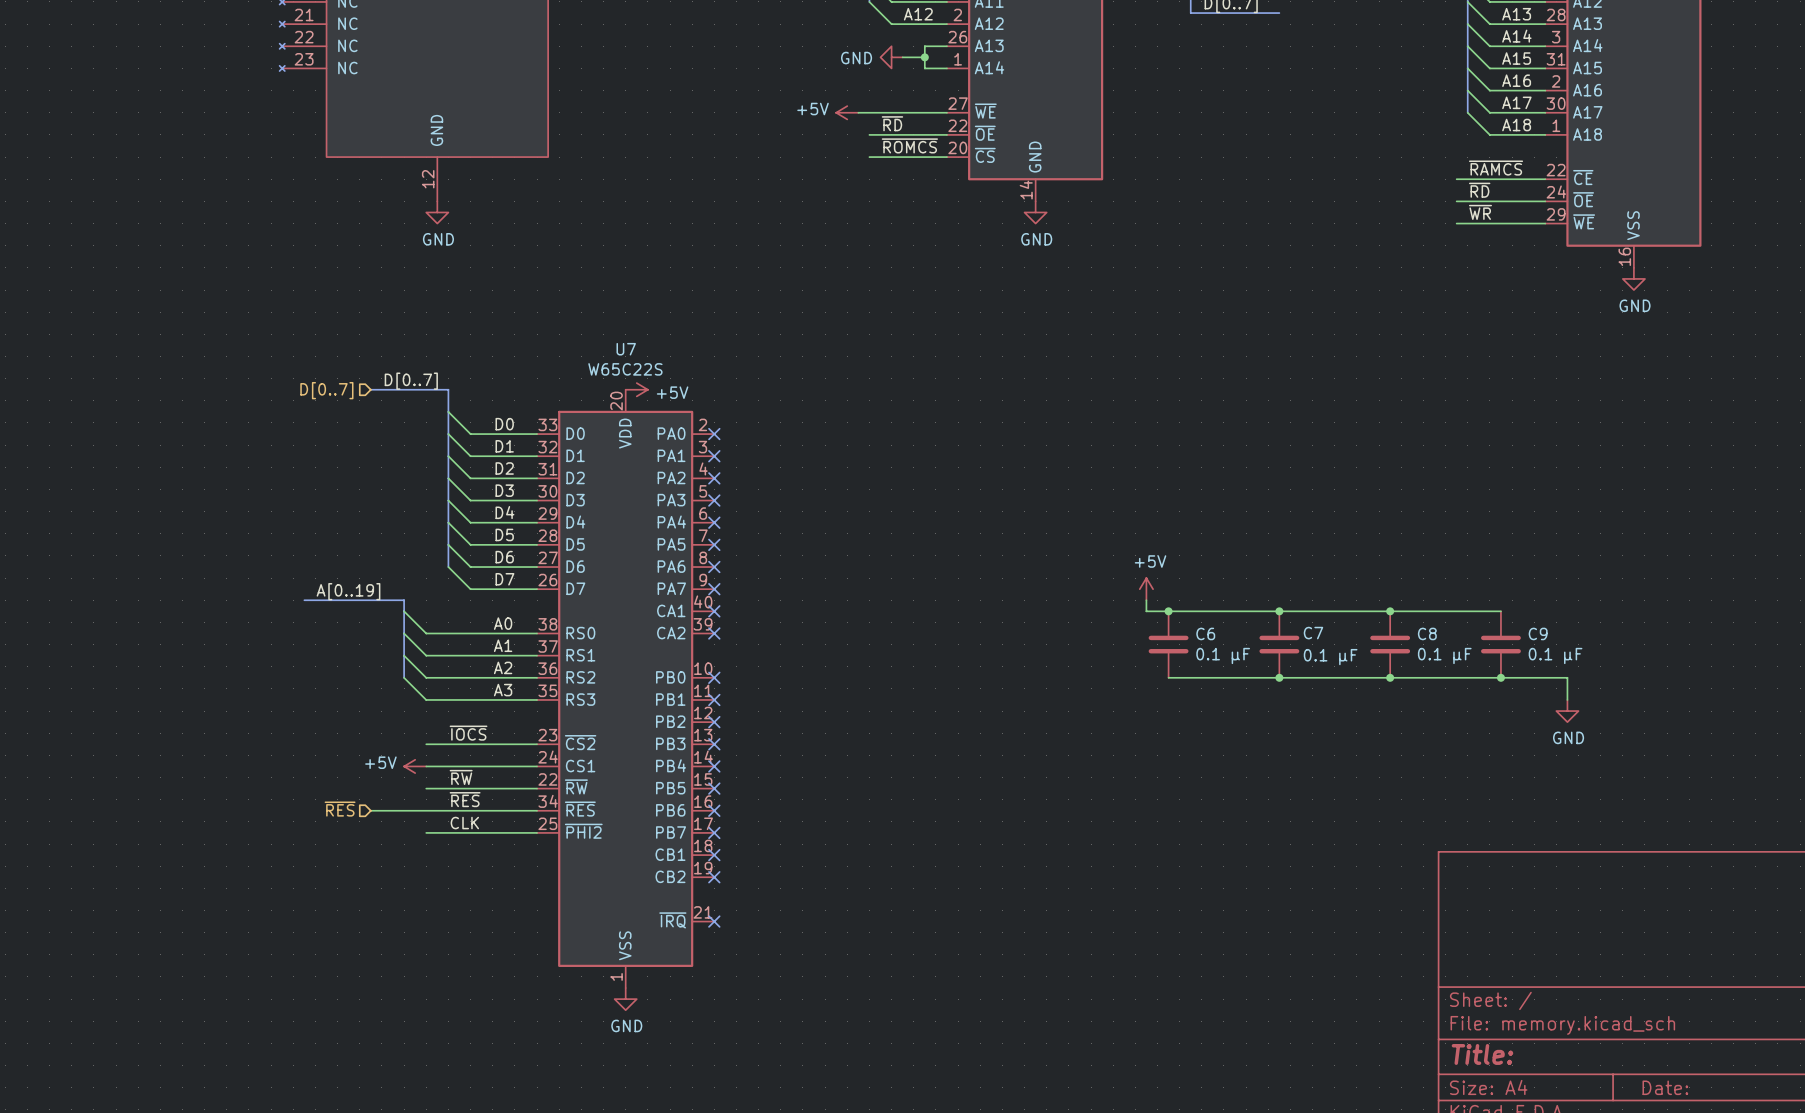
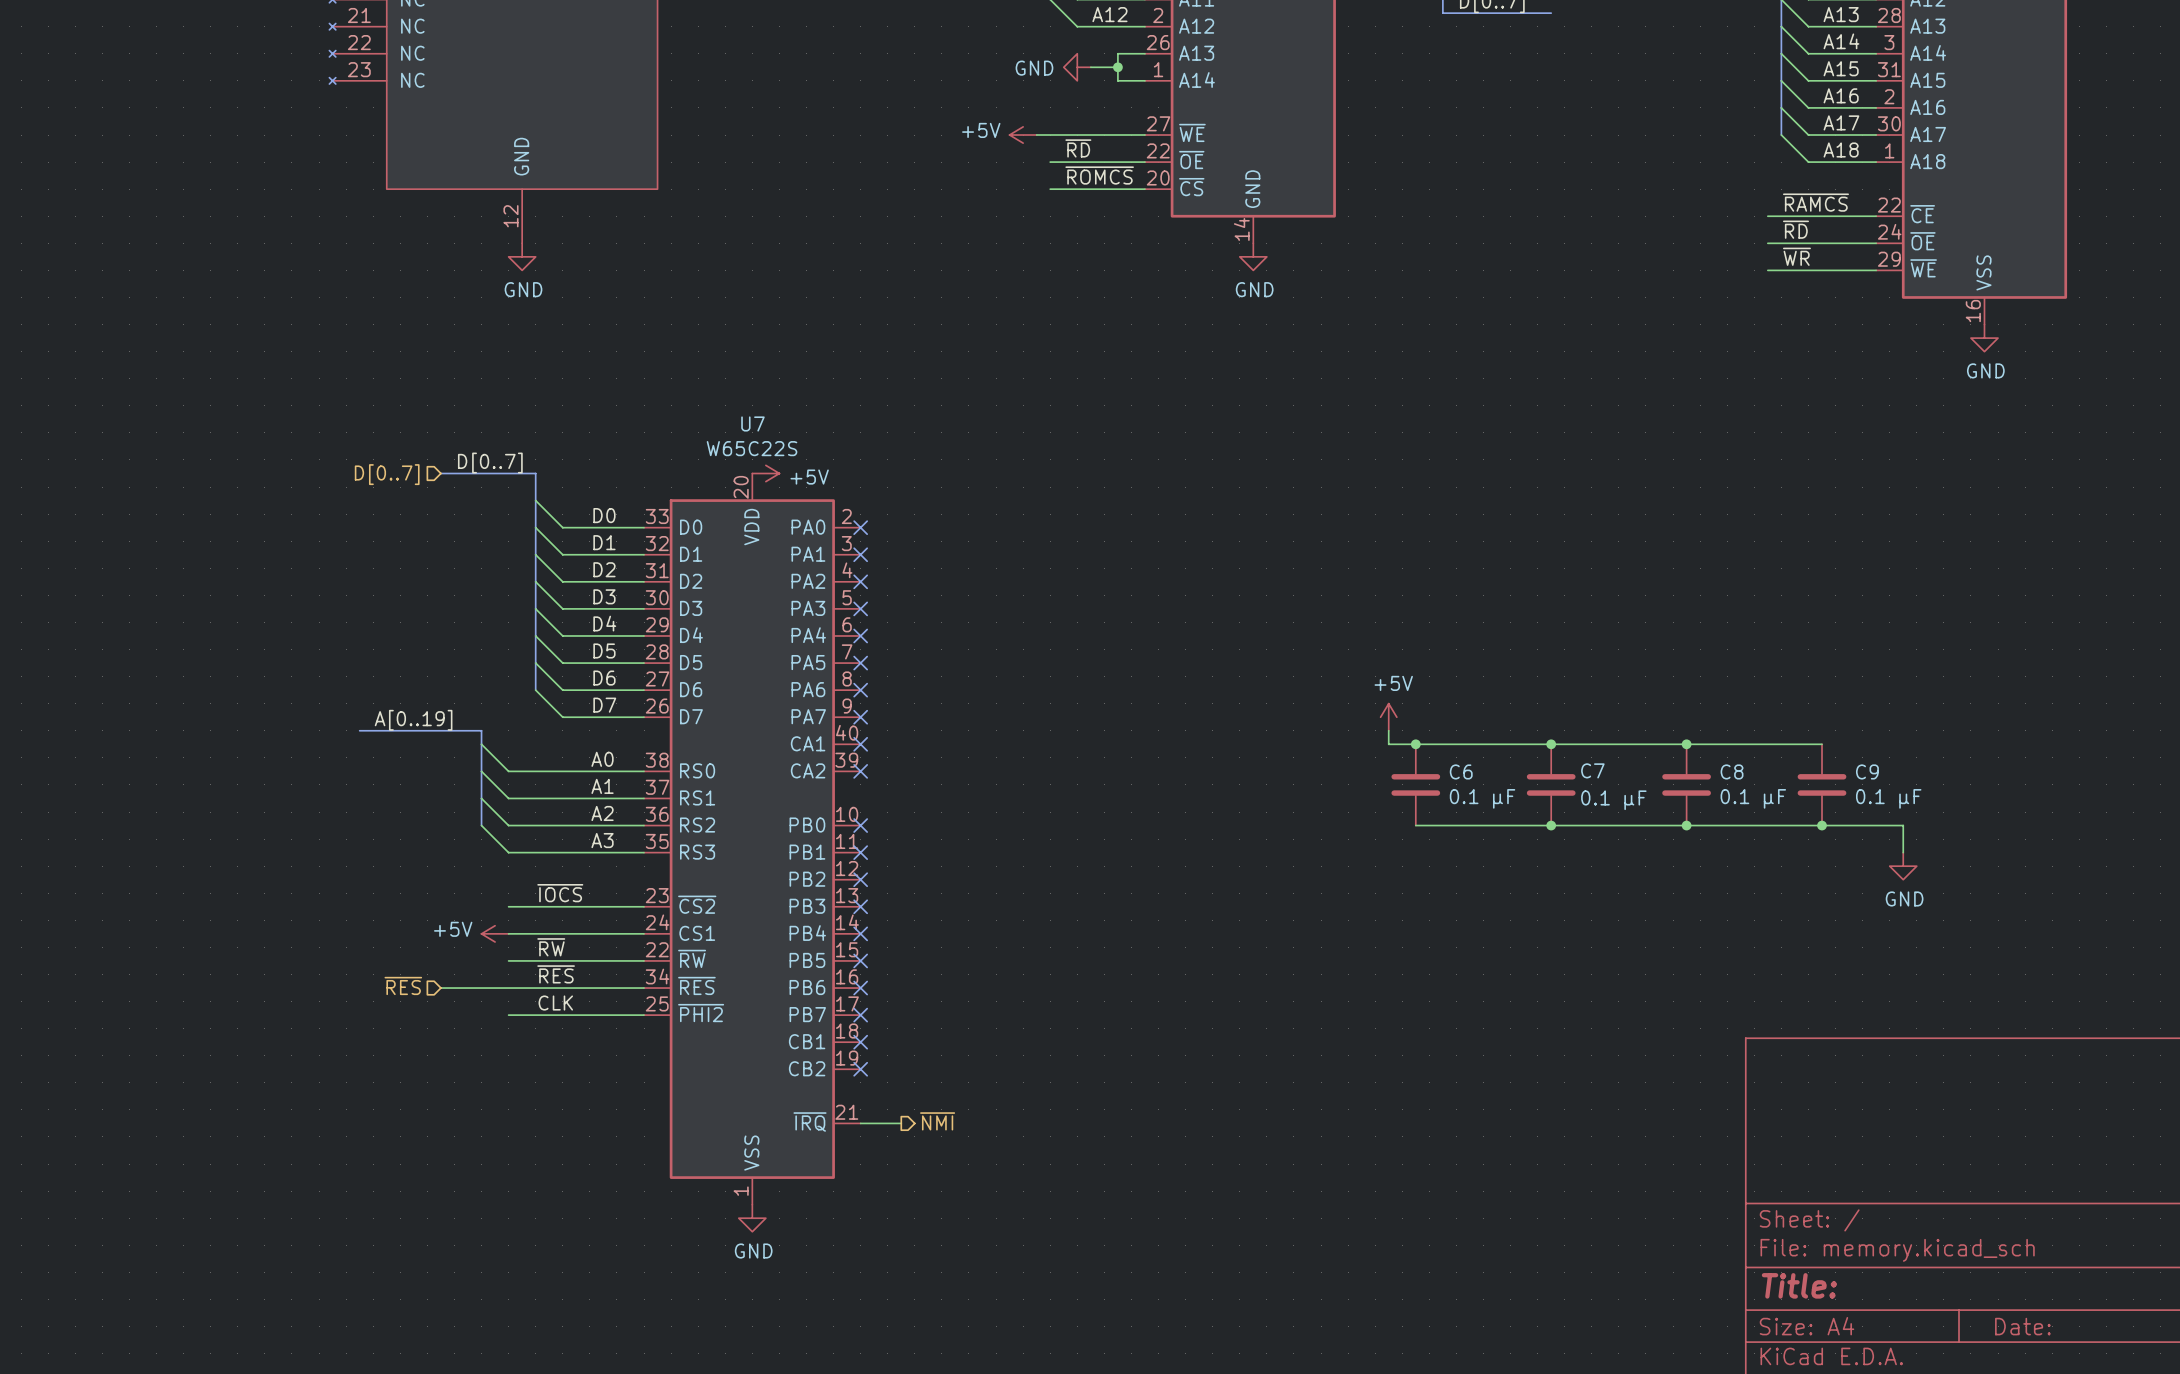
hierarchical label: none -> ~{NMI} (937, 1121)
wire: none -> (860, 1123) (901, 1123)
no-connect mark: (714, 921) -> none

